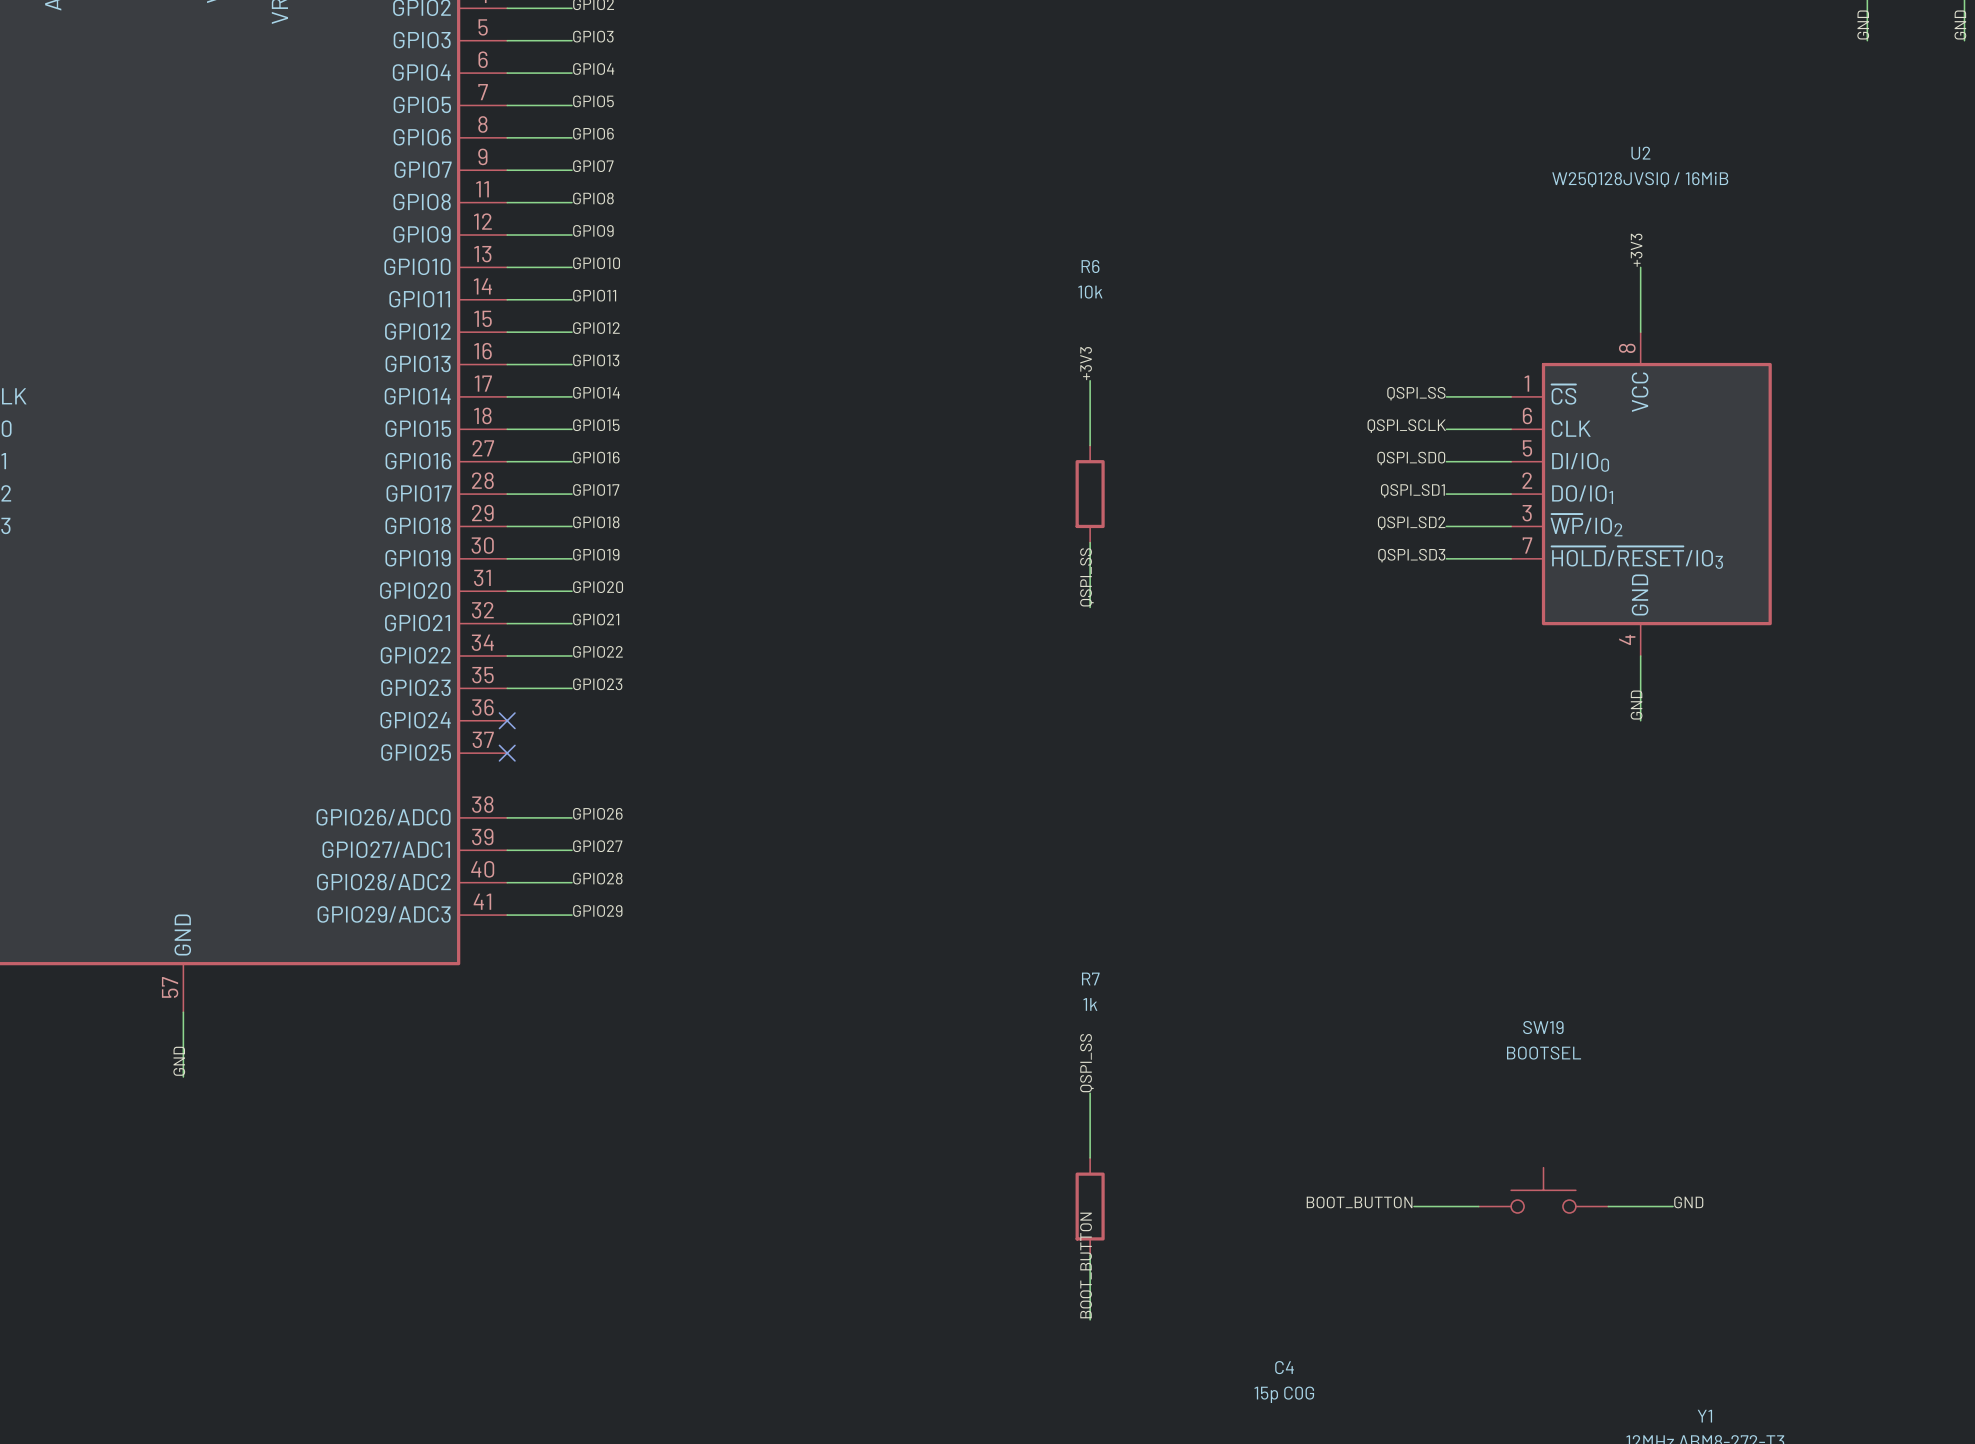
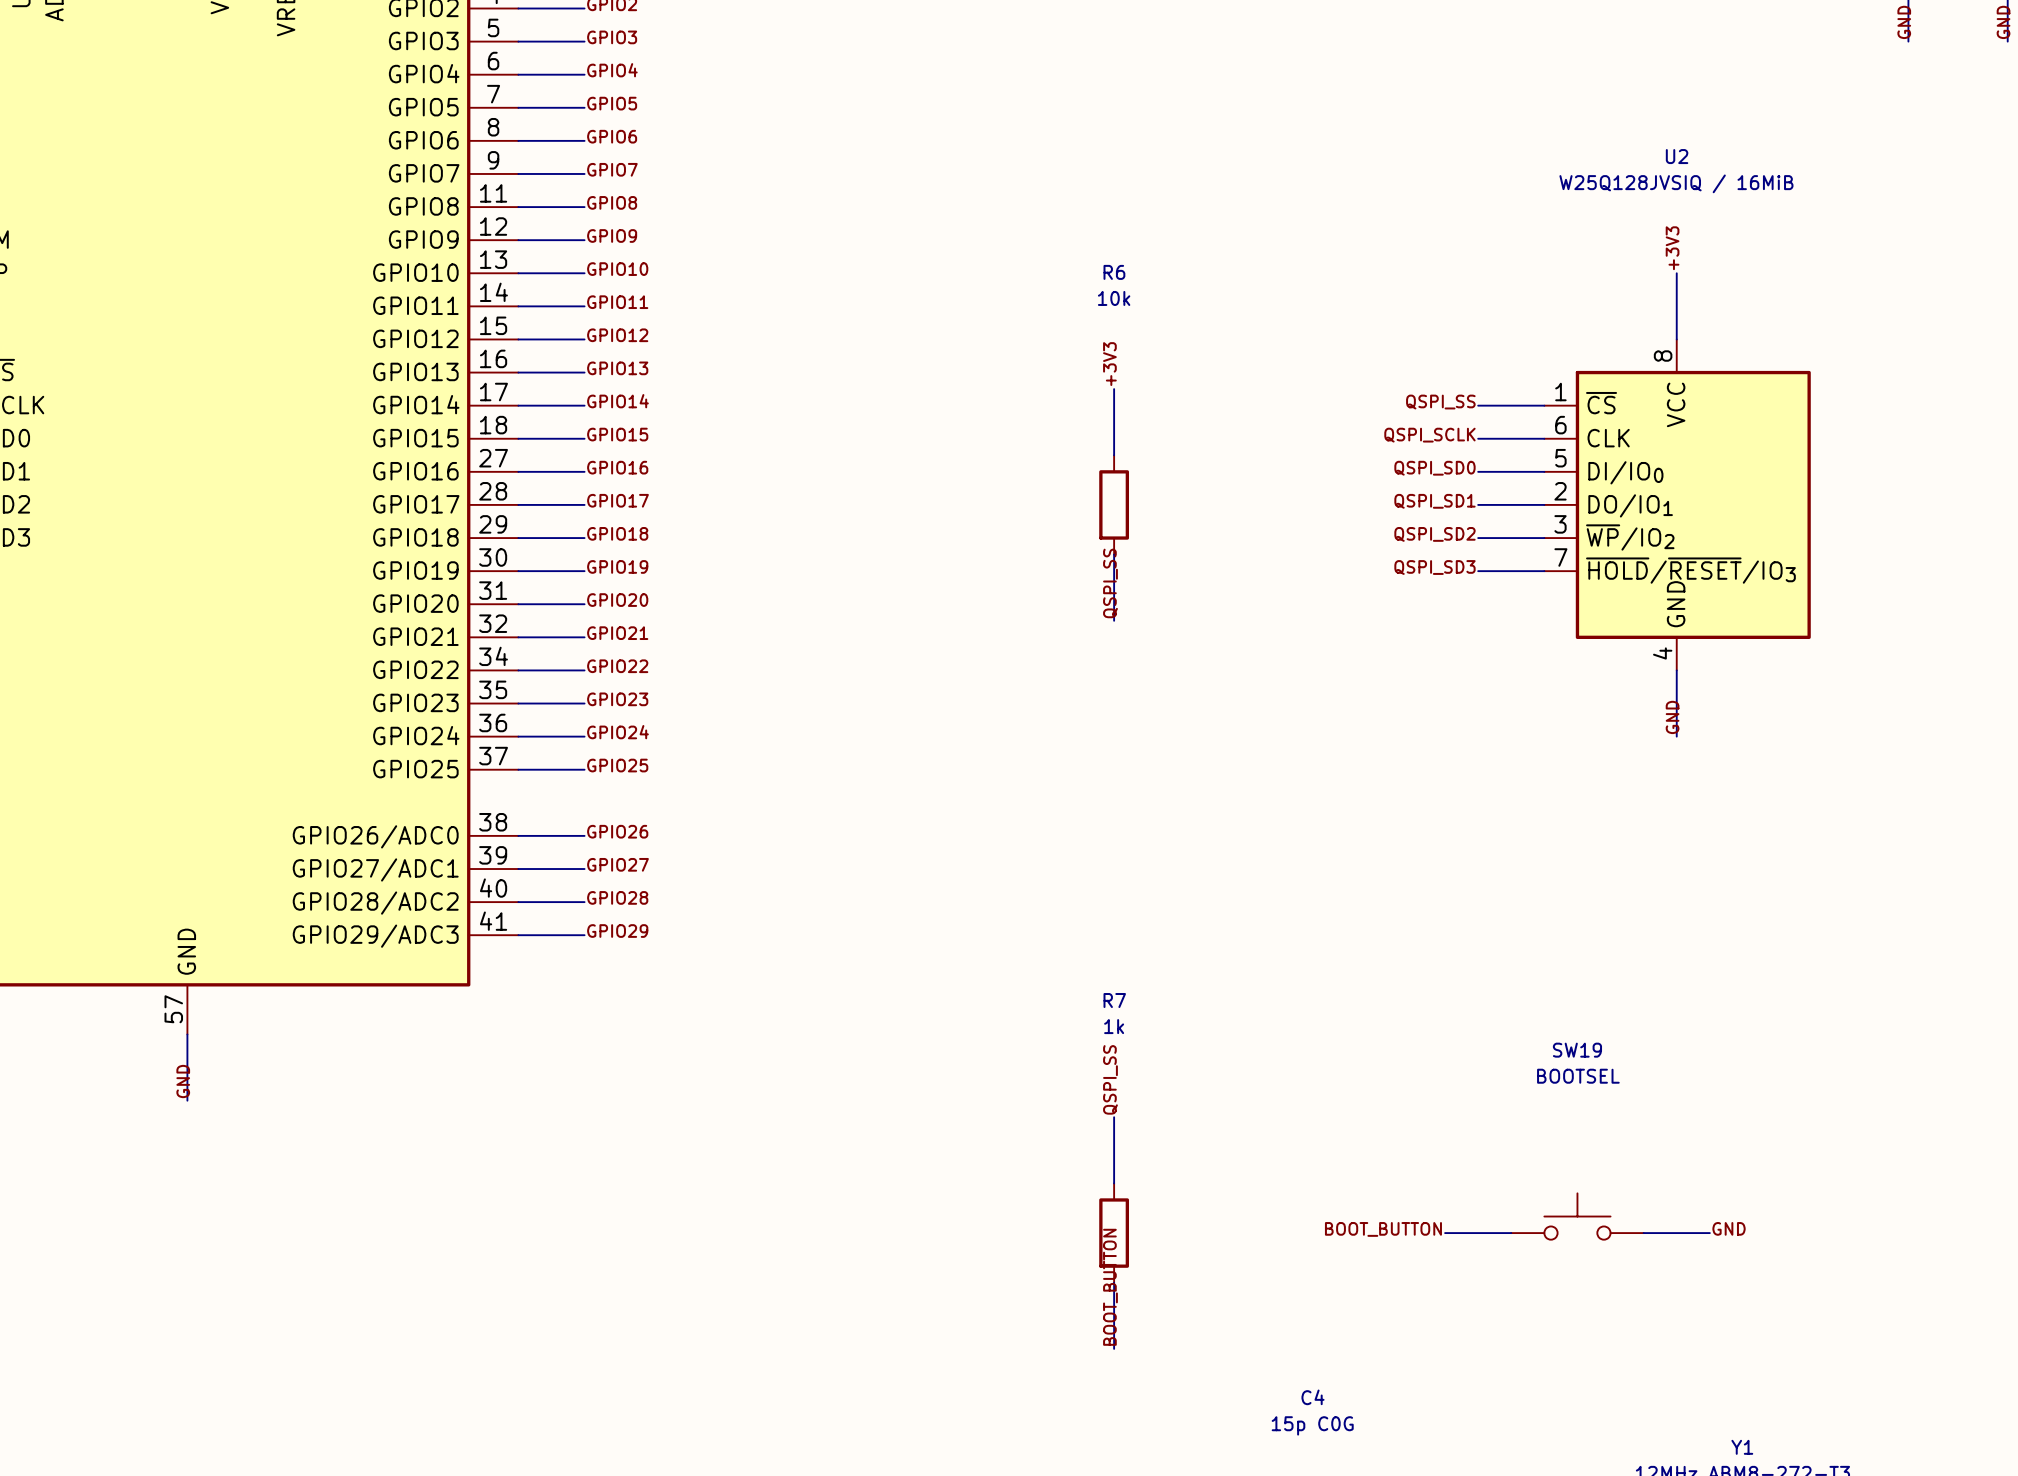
label: none -> GPIO24 (617, 732)
wire: none -> (518, 736) (584, 736)
no-connect mark: (507, 720) -> none
label: none -> GPIO25 (617, 765)
wire: none -> (518, 769) (584, 769)
no-connect mark: (507, 753) -> none

